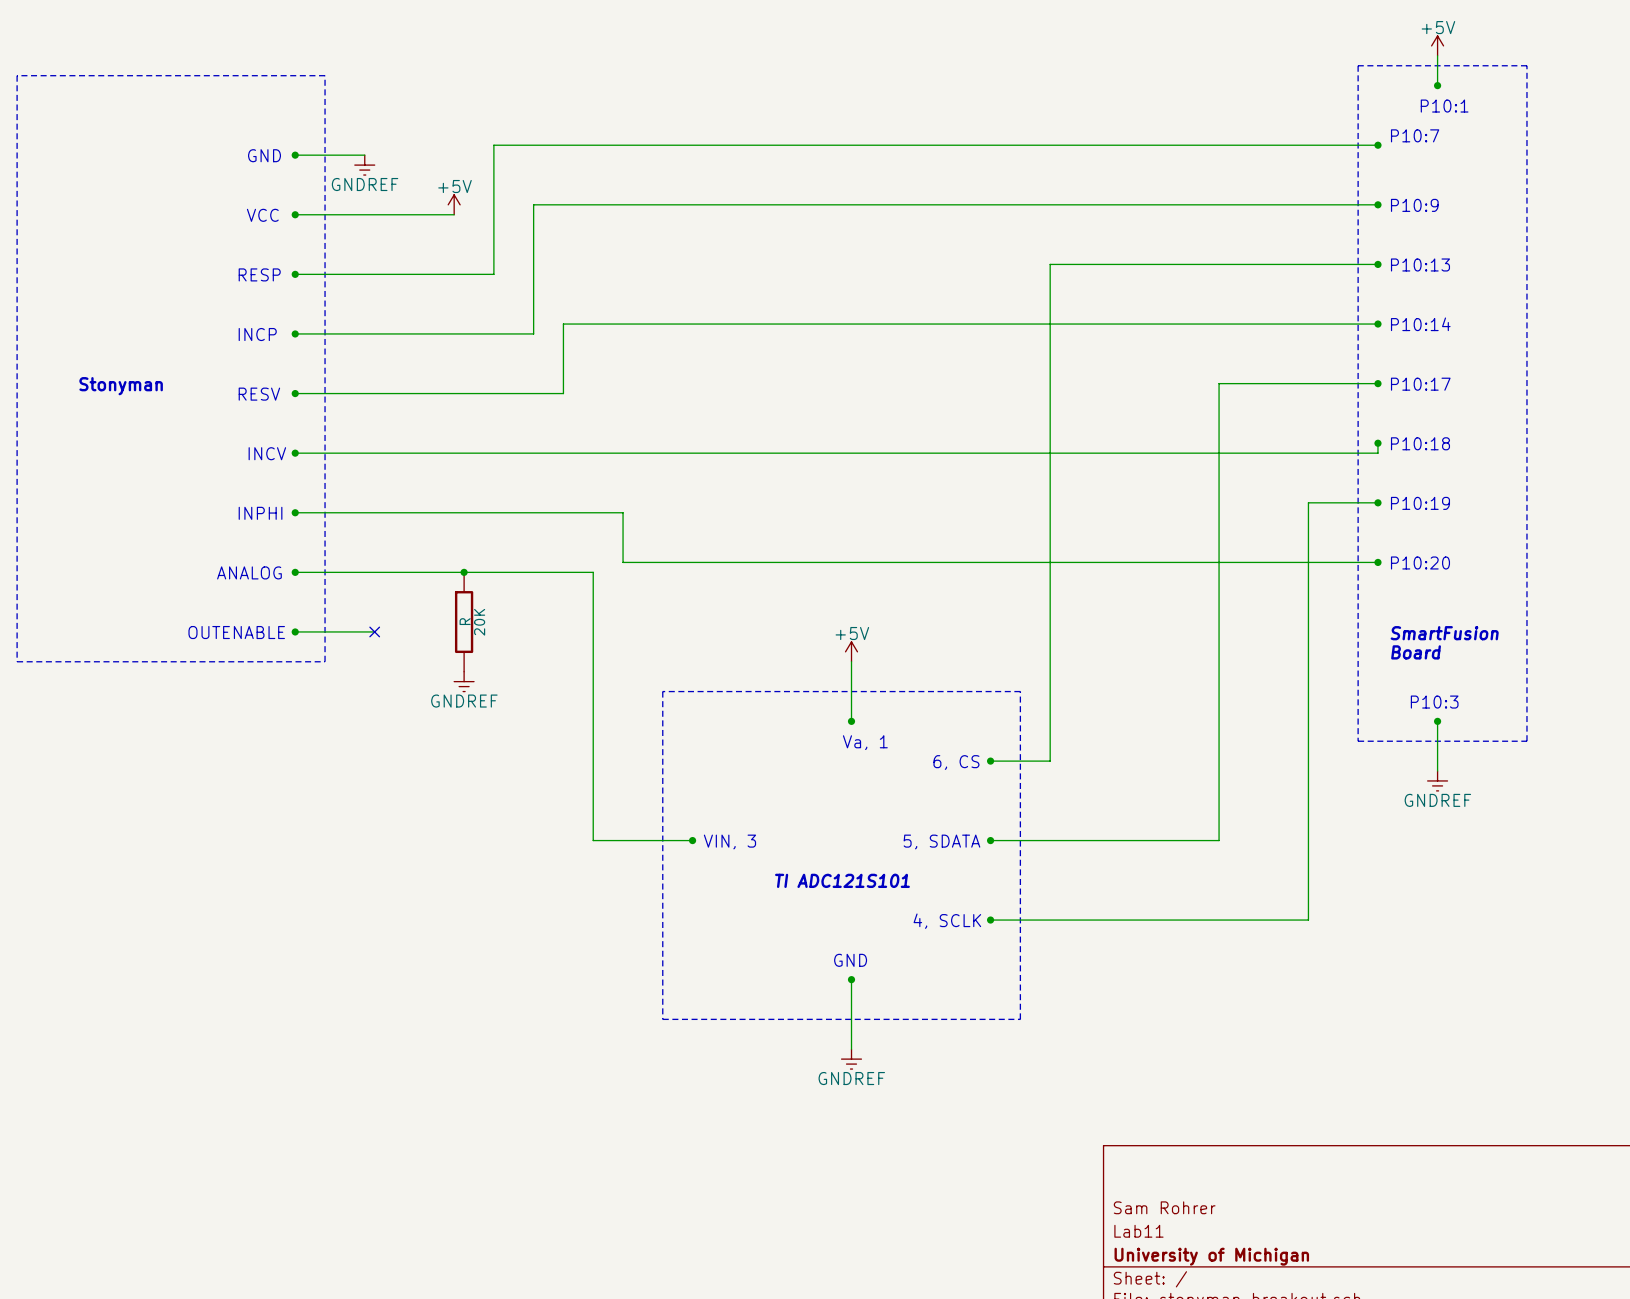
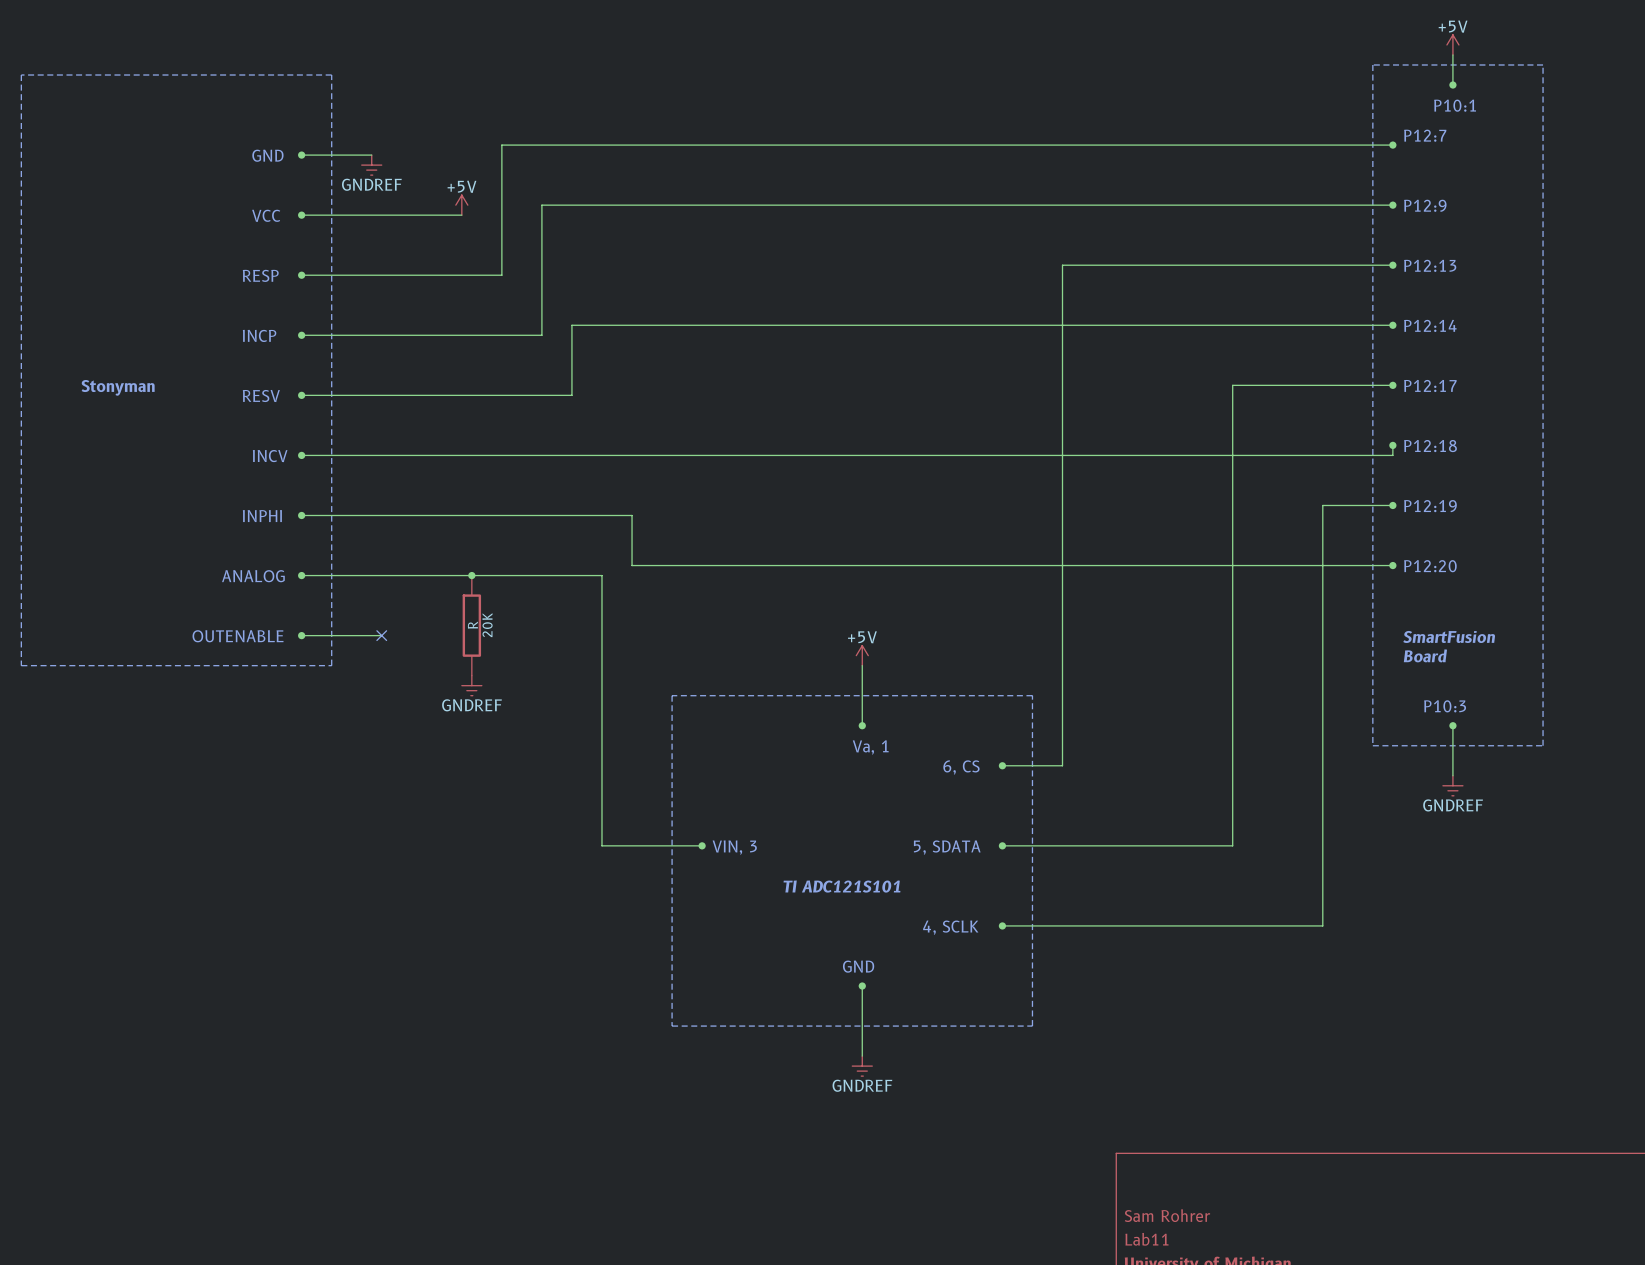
text: P10:7 (1415, 135) -> P12:7 (1425, 135)
text: P10:9 (1414, 205) -> P12:9 (1425, 205)
text: P10:13 (1420, 264) -> P12:13 (1430, 265)
text: P10:14 (1420, 324) -> P12:14 (1430, 325)
text: P10:17 (1420, 384) -> P12:17 (1430, 385)
text: P10:18 (1420, 443) -> P12:18 (1430, 446)
text: P10:19 (1420, 503) -> P12:19 (1430, 506)
text: P10:20 (1420, 562) -> P12:20 (1430, 566)

